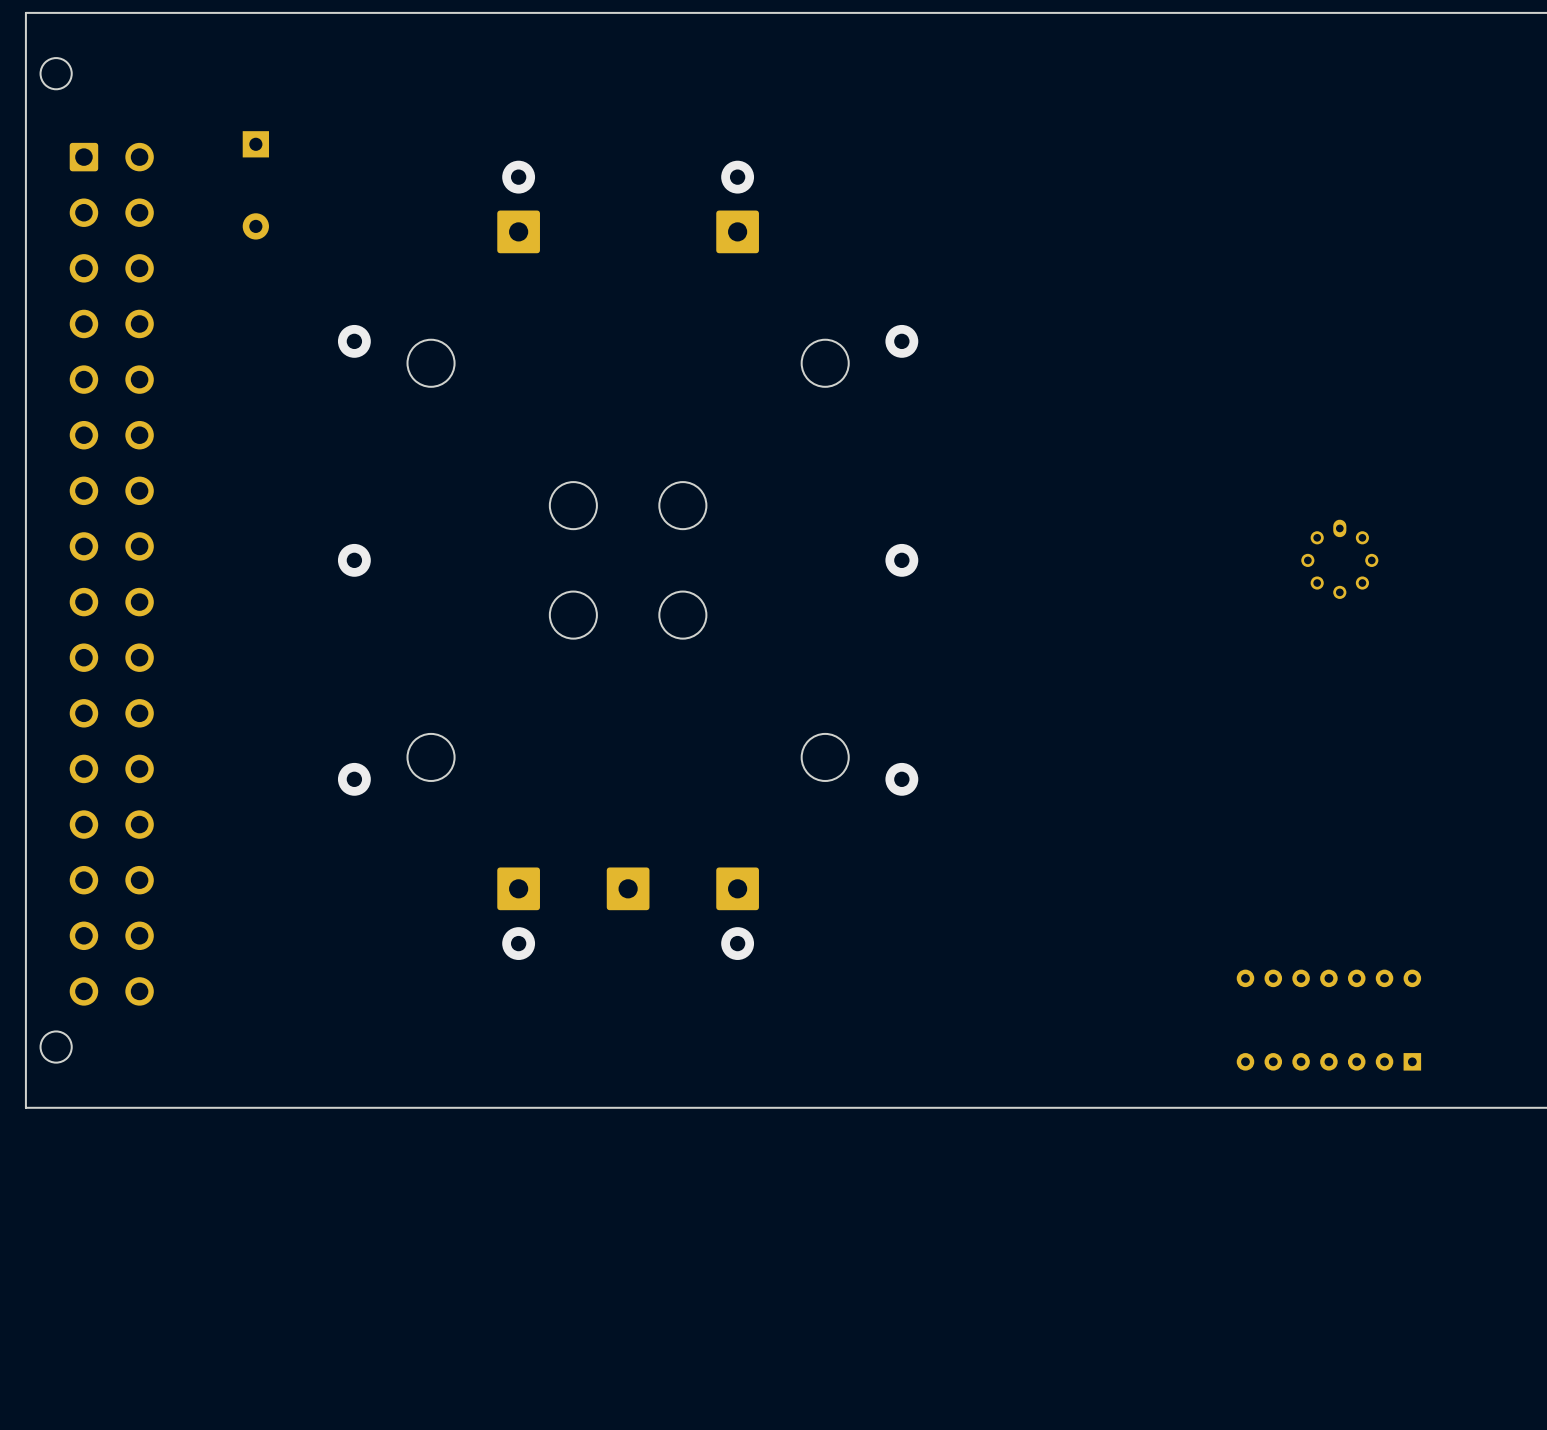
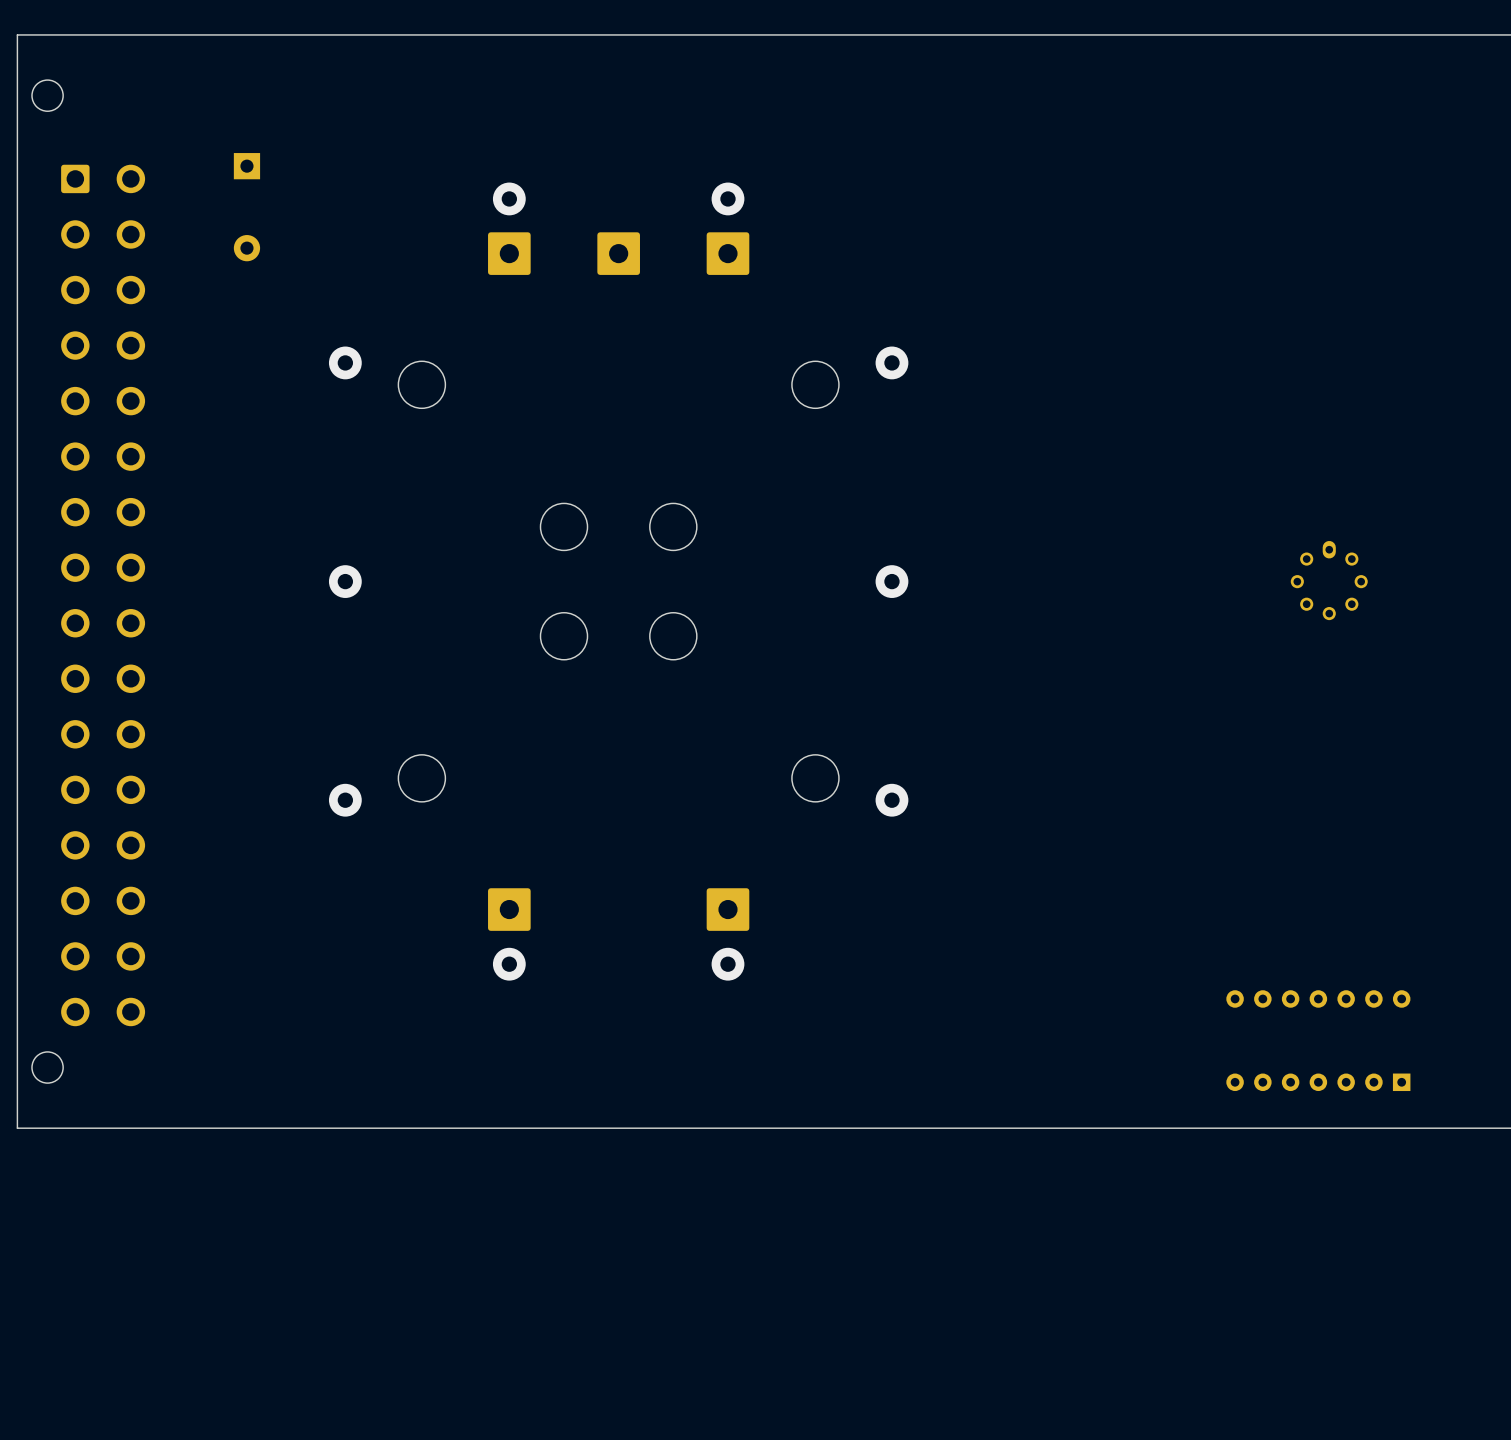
part: none -> (618, 253)
part: (628, 888) -> none

